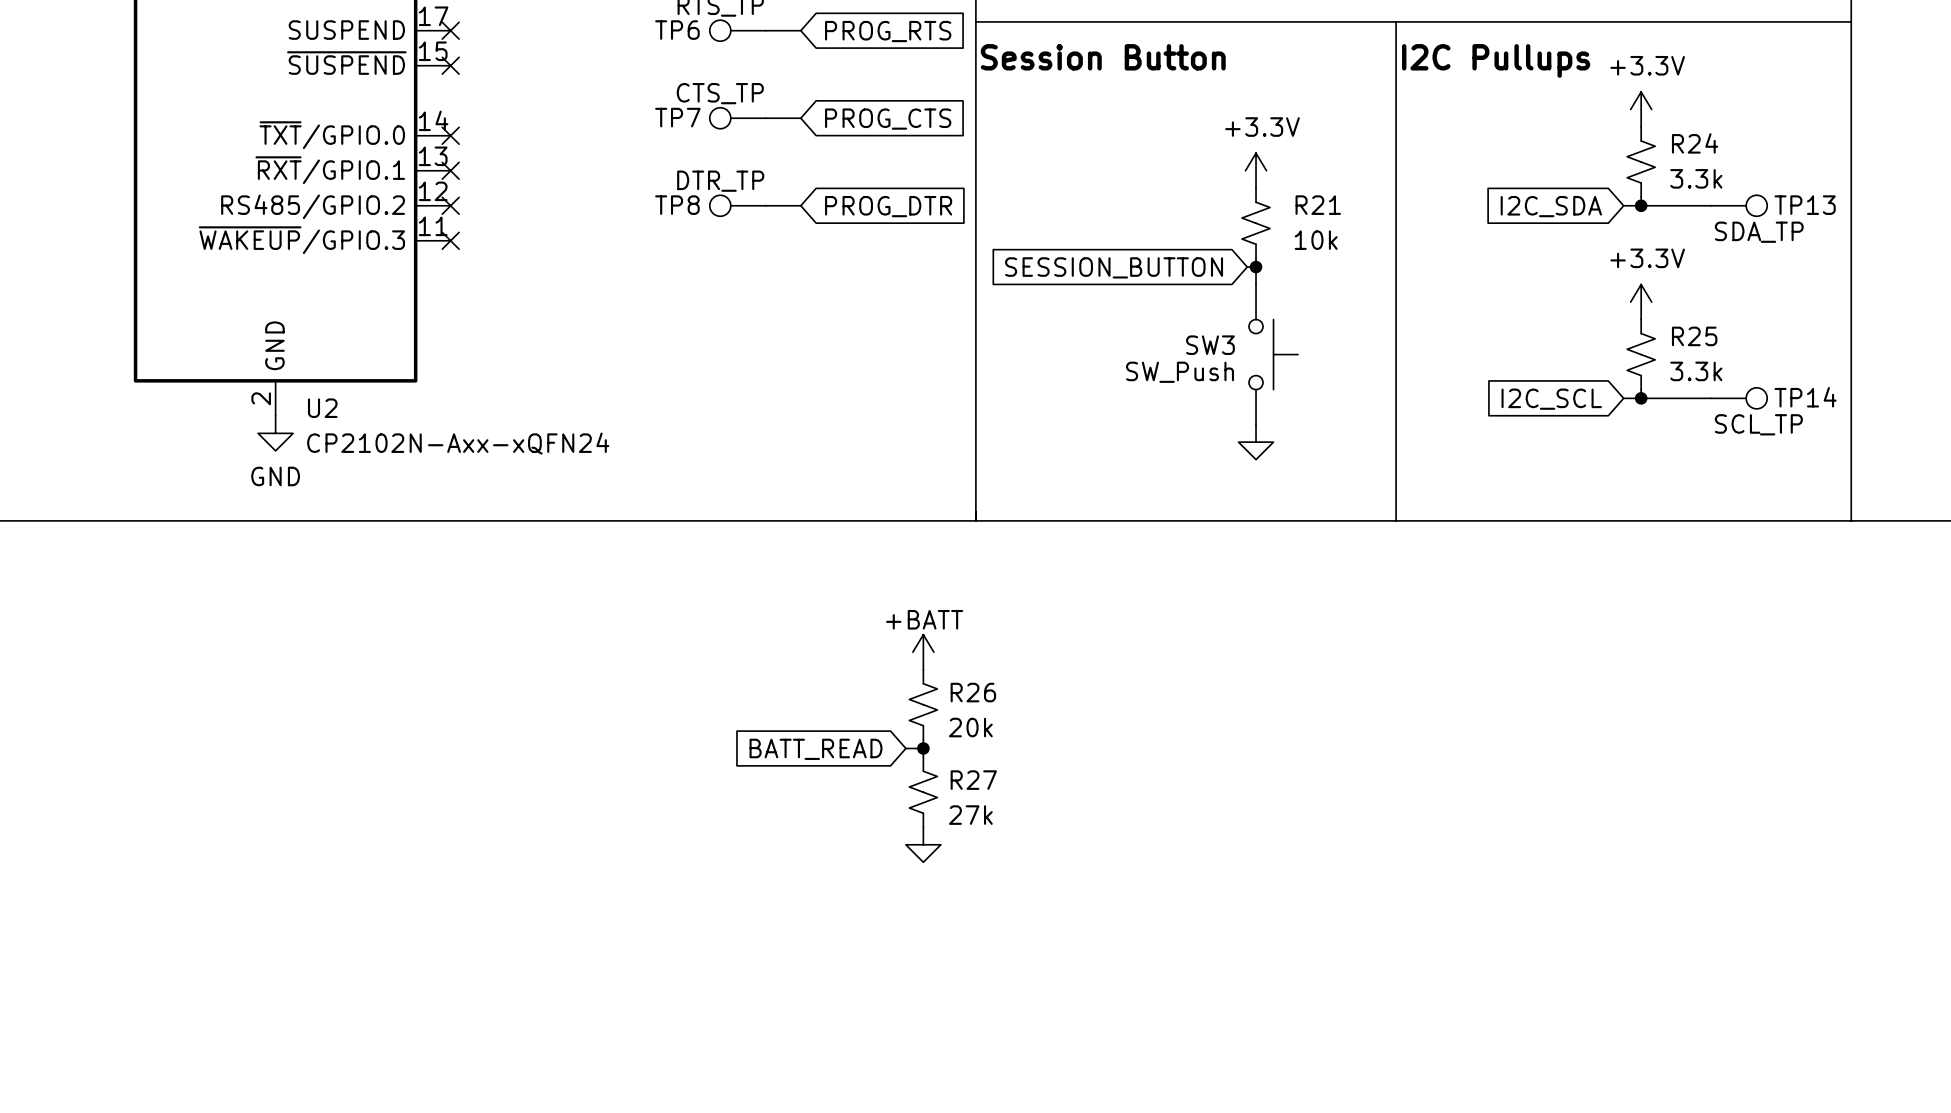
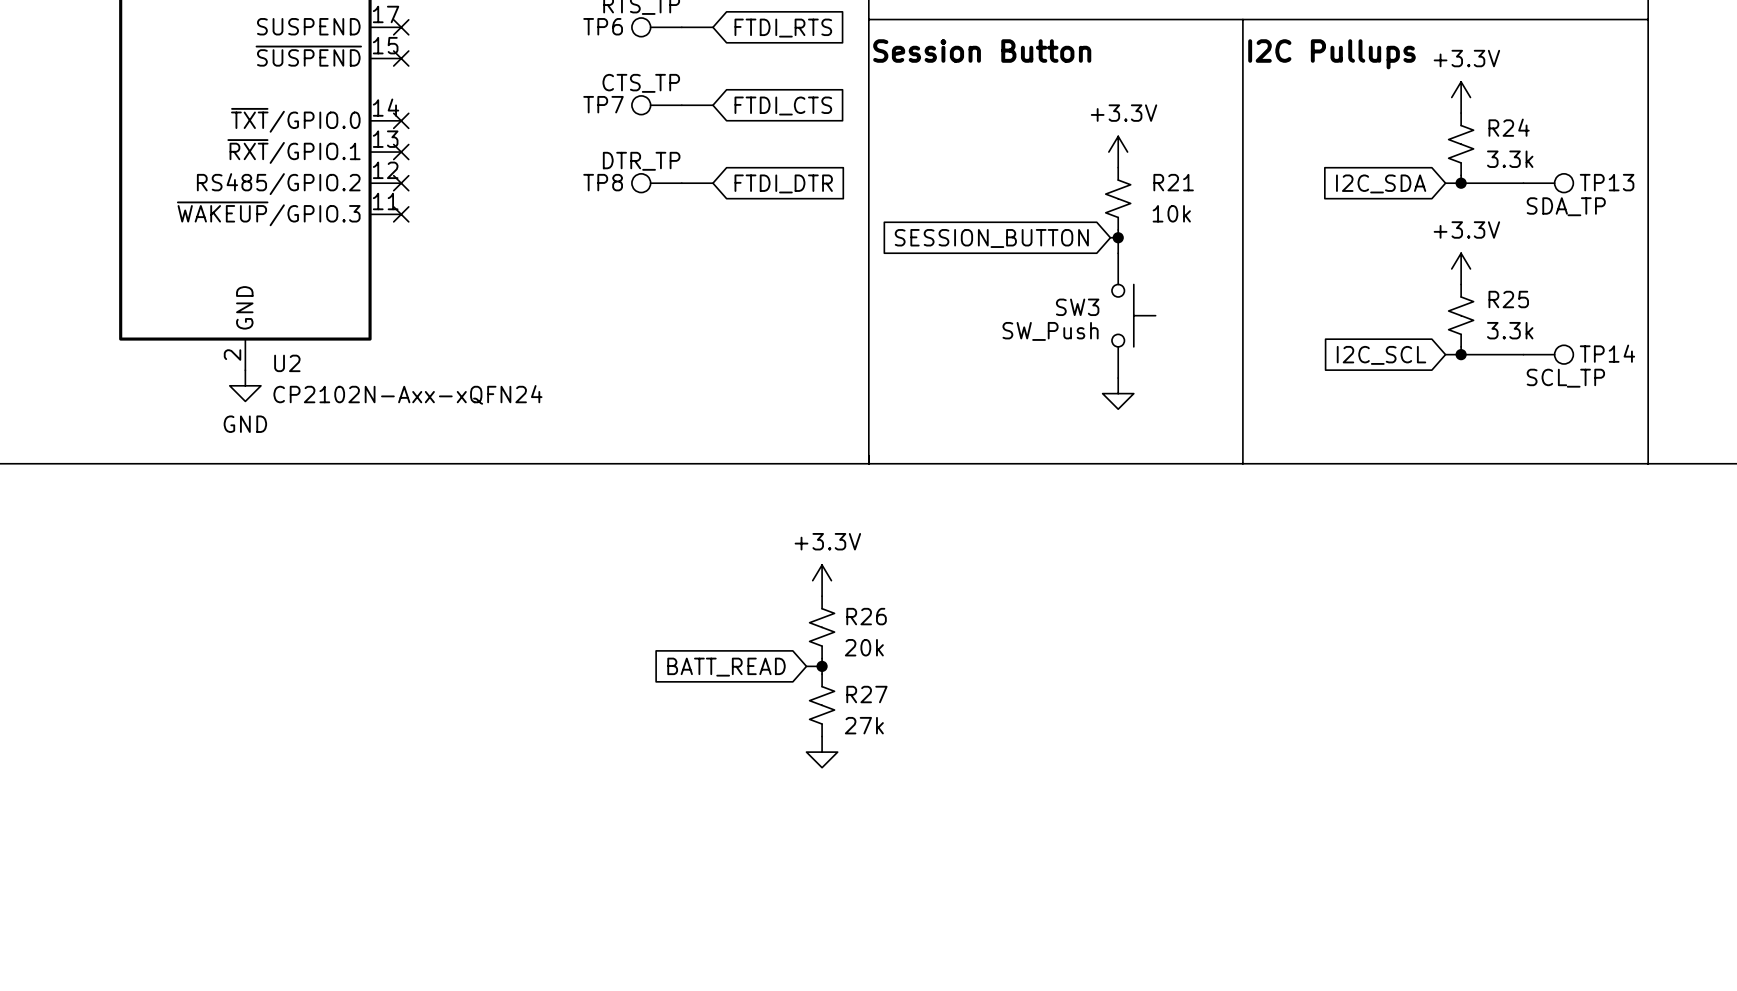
global label: PROG_RTS (888, 31) -> FTDI_RTS (783, 28)
global label: PROG_CTS (888, 119) -> FTDI_CTS (783, 106)
global label: PROG_DTR (888, 206) -> FTDI_DTR (783, 183)
power symbol: +BATT (923, 652) -> +3.3V (822, 580)

